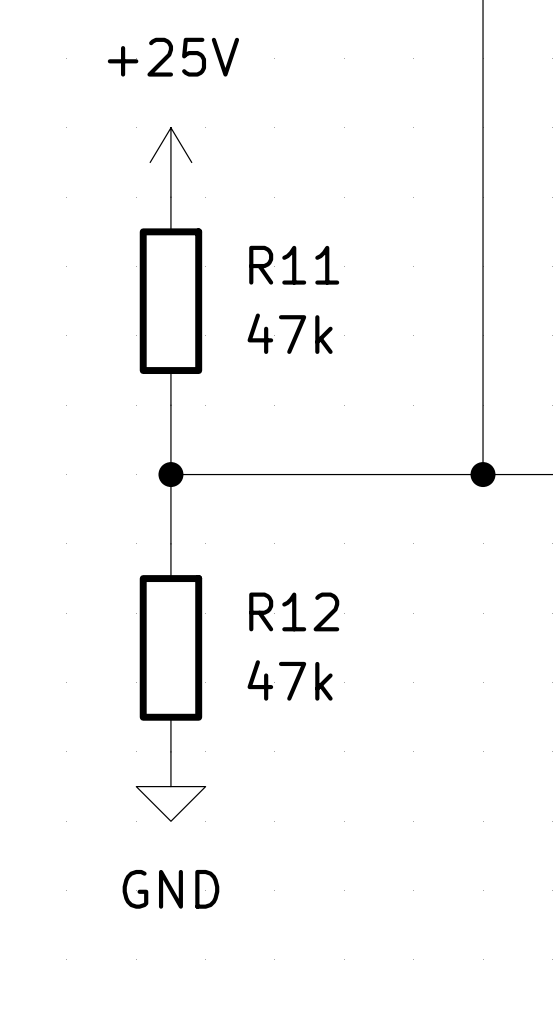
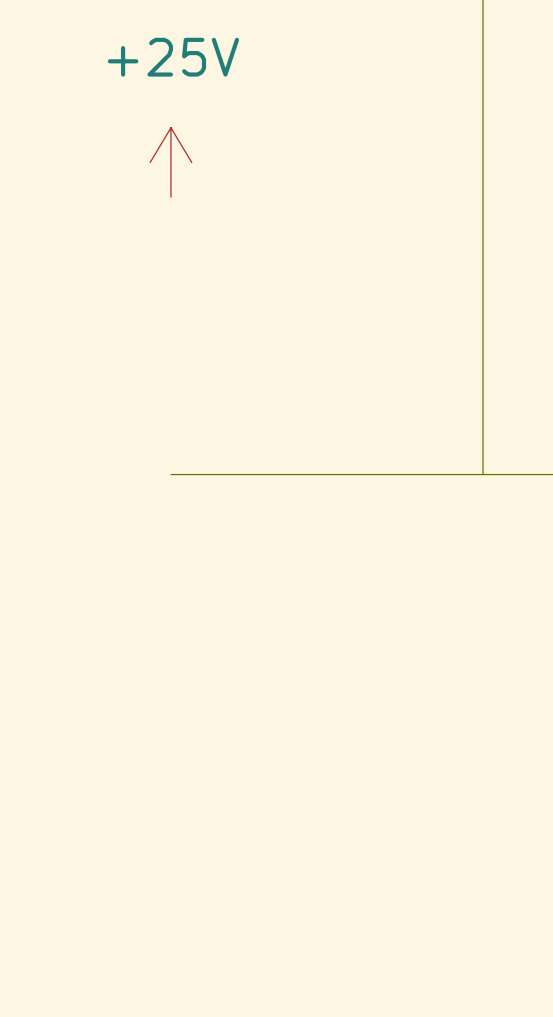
R11: 47k (170, 301) -> none
wire: (170, 405) (170, 543) -> none
junction: (170, 474) -> none
junction: (483, 474) -> none
R12: 47k (170, 647) -> none
power symbol: GND (170, 786) -> none

